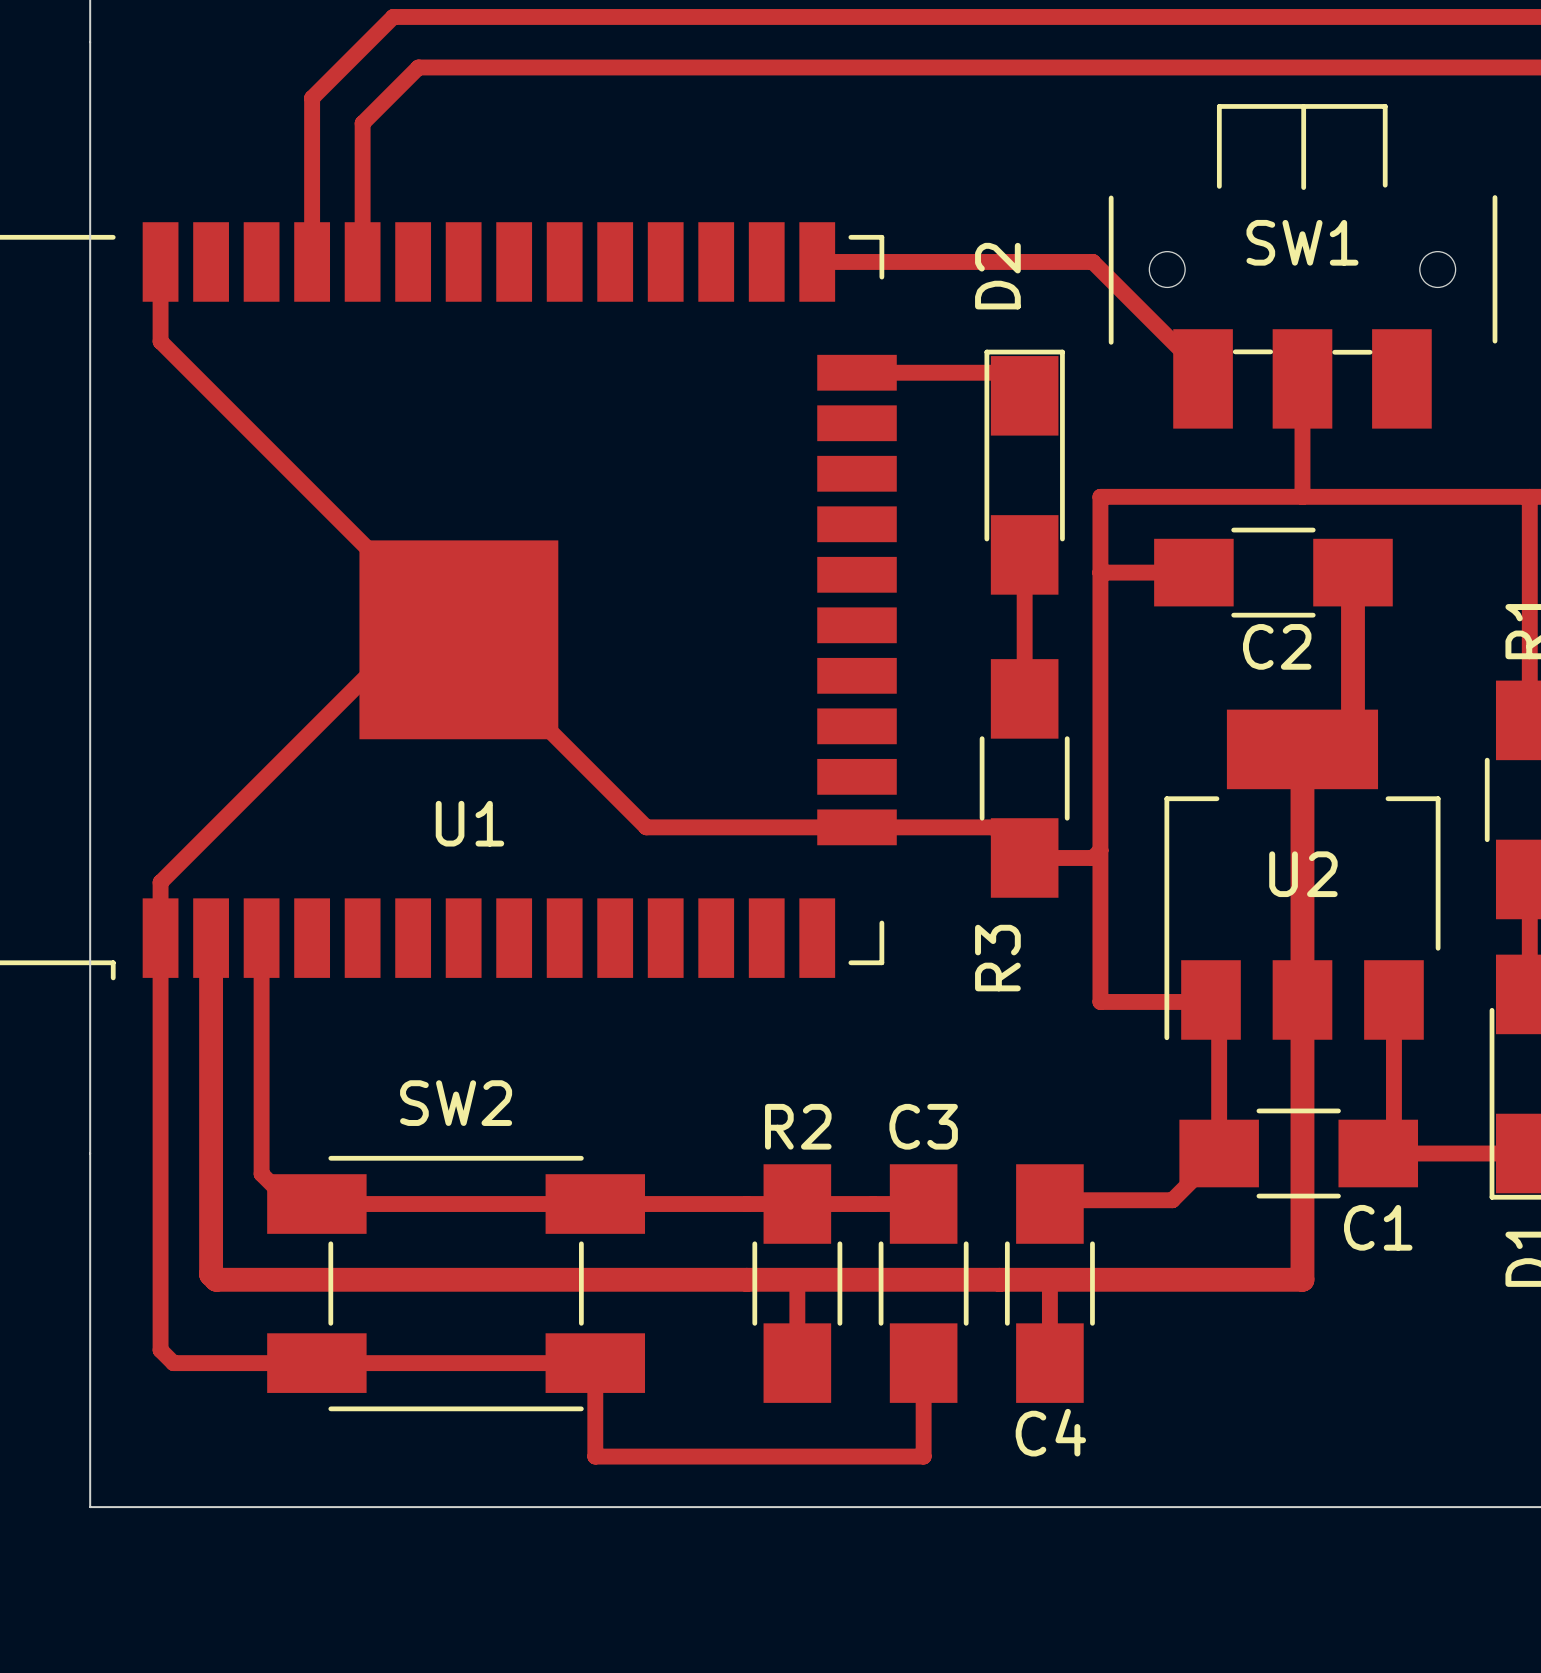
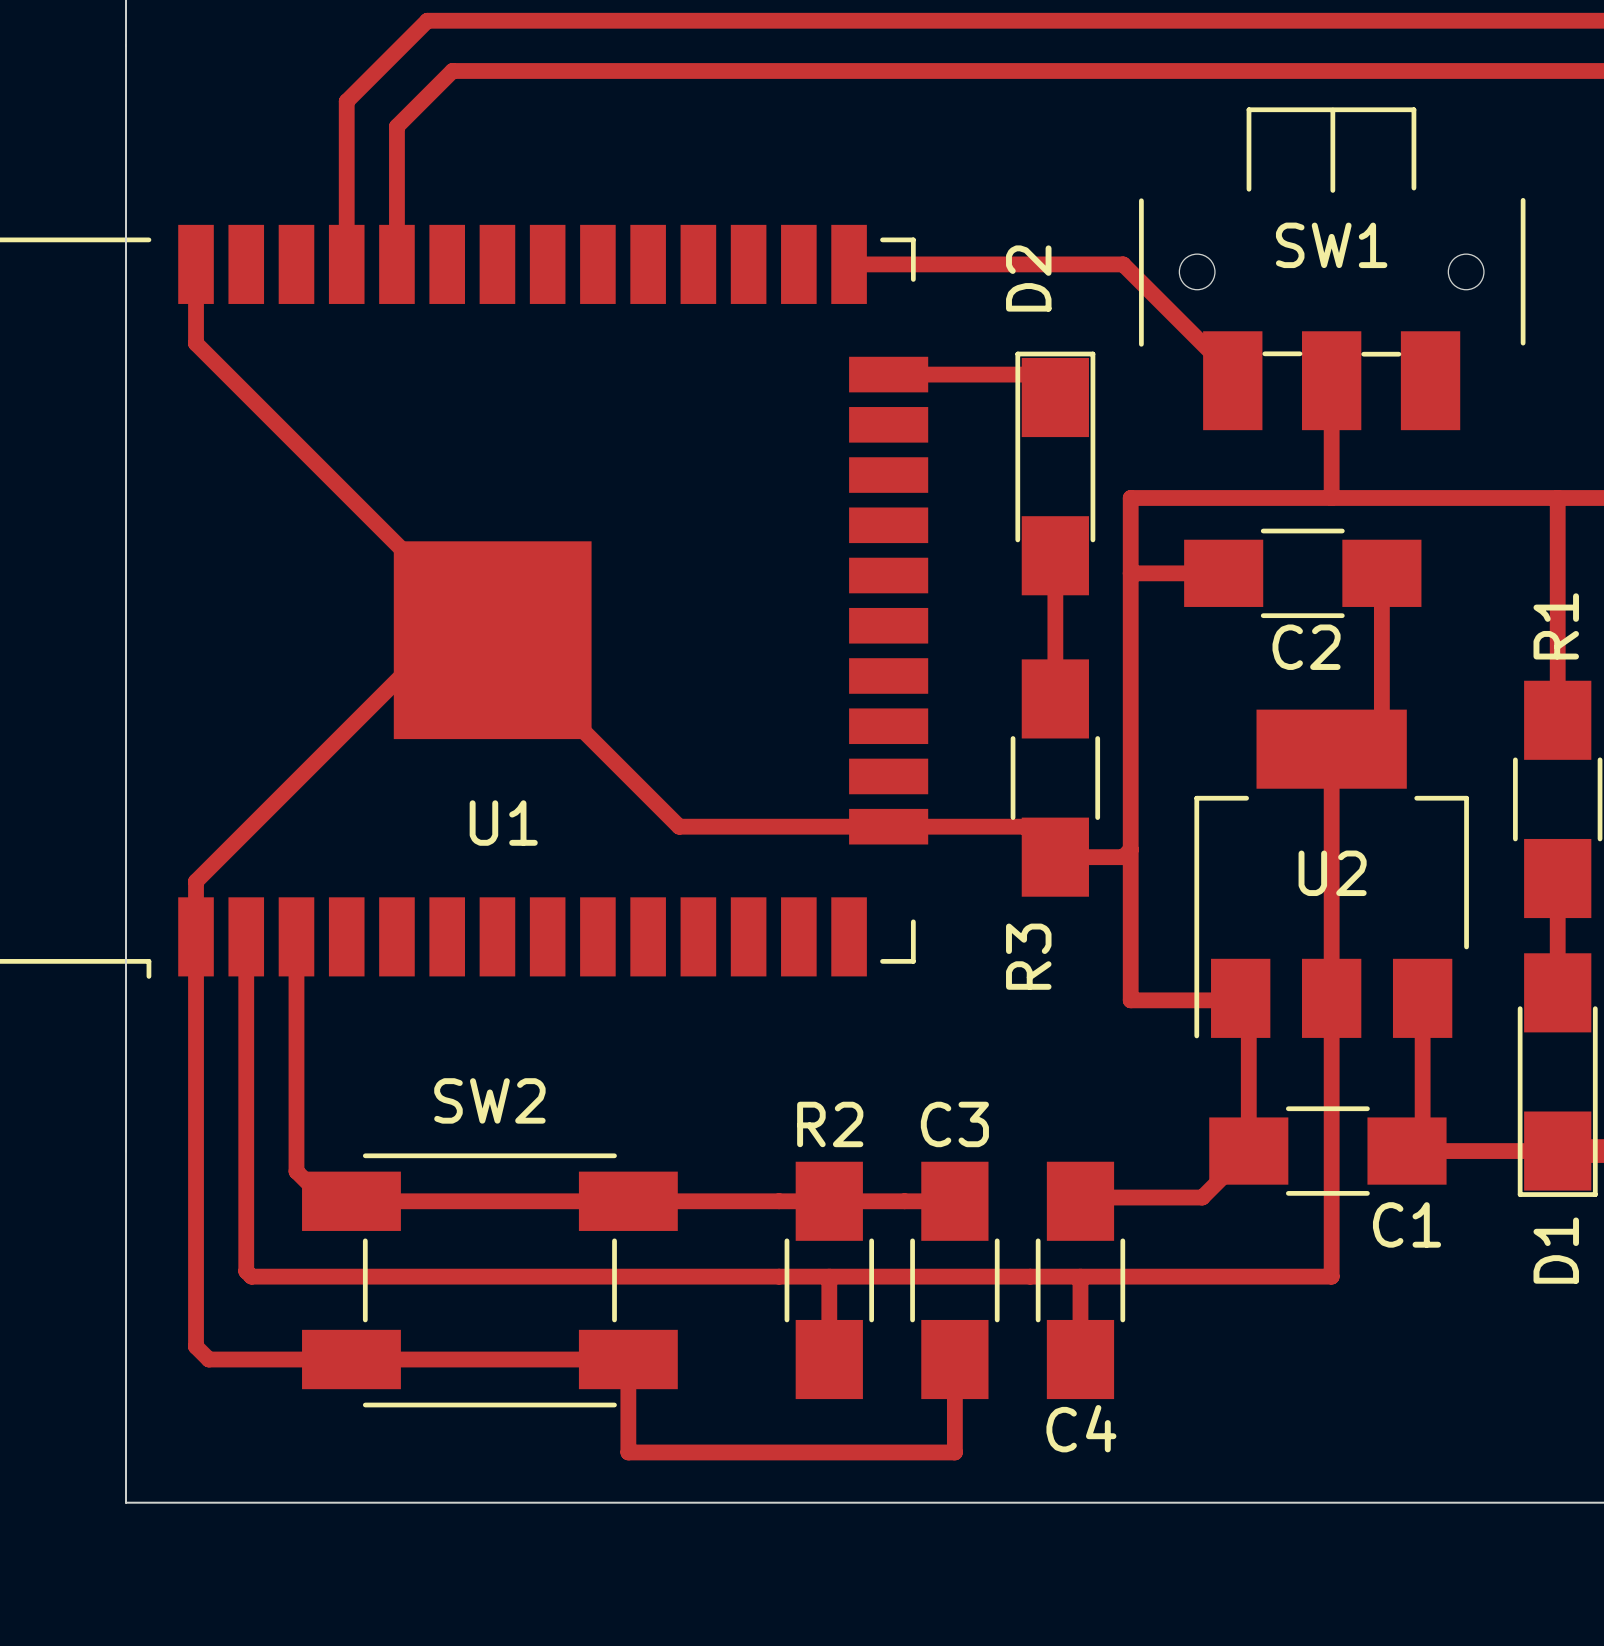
top track width: thick (1352, 572) (1352, 724) -> thin (1381, 573) (1381, 724)
top track width: thick (1302, 749) (1302, 1279) (216, 1279) (211, 1274) (211, 938) -> thin (1331, 749) (1331, 1276) (251, 1276) (246, 1271) (246, 936)

